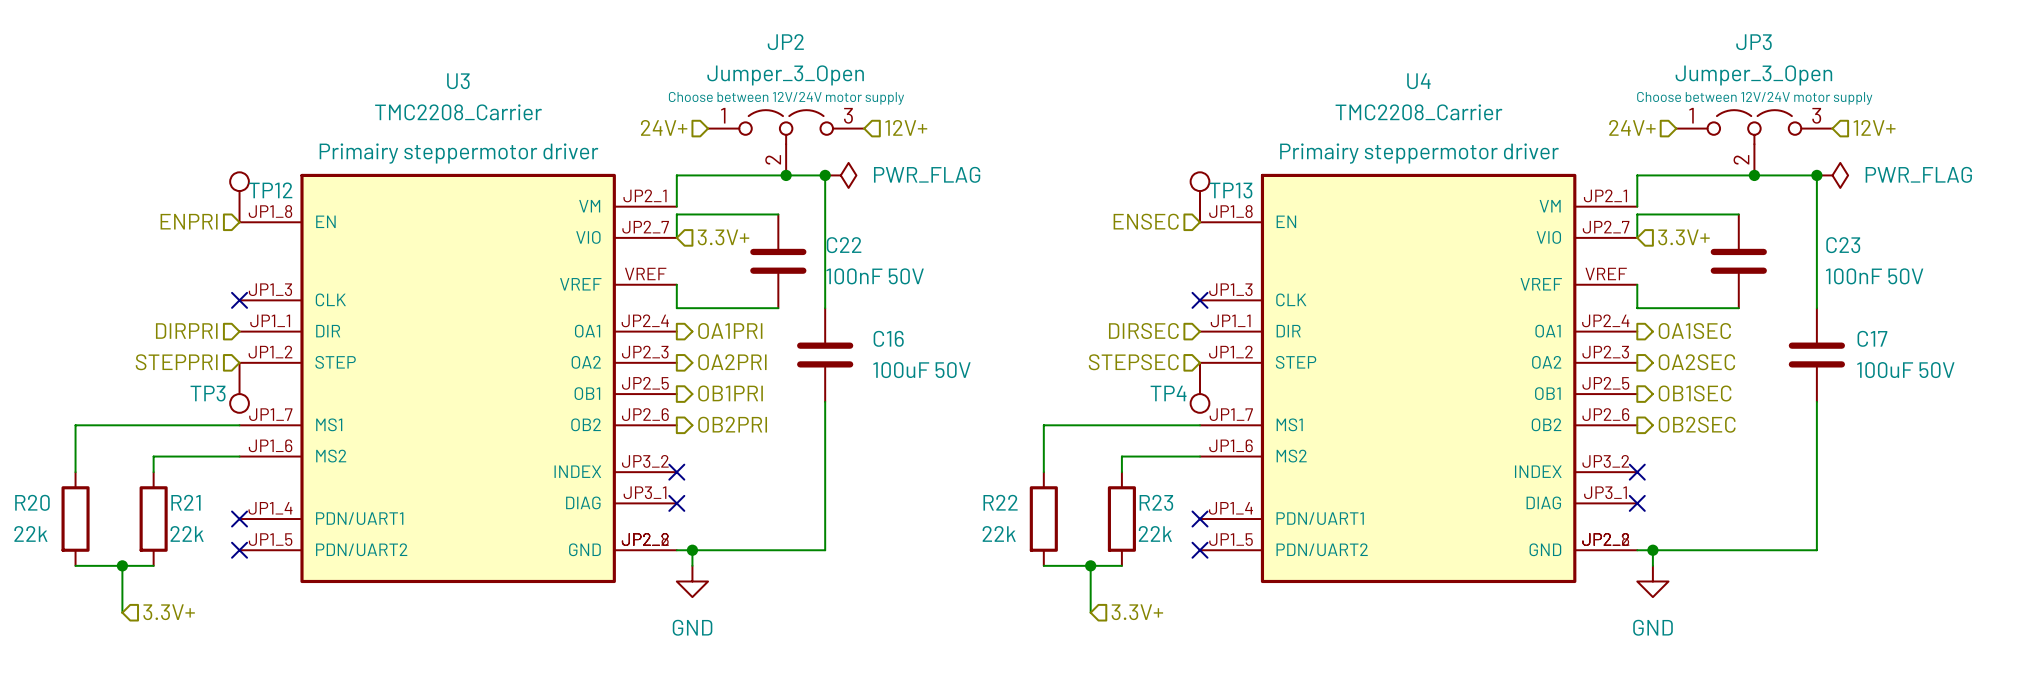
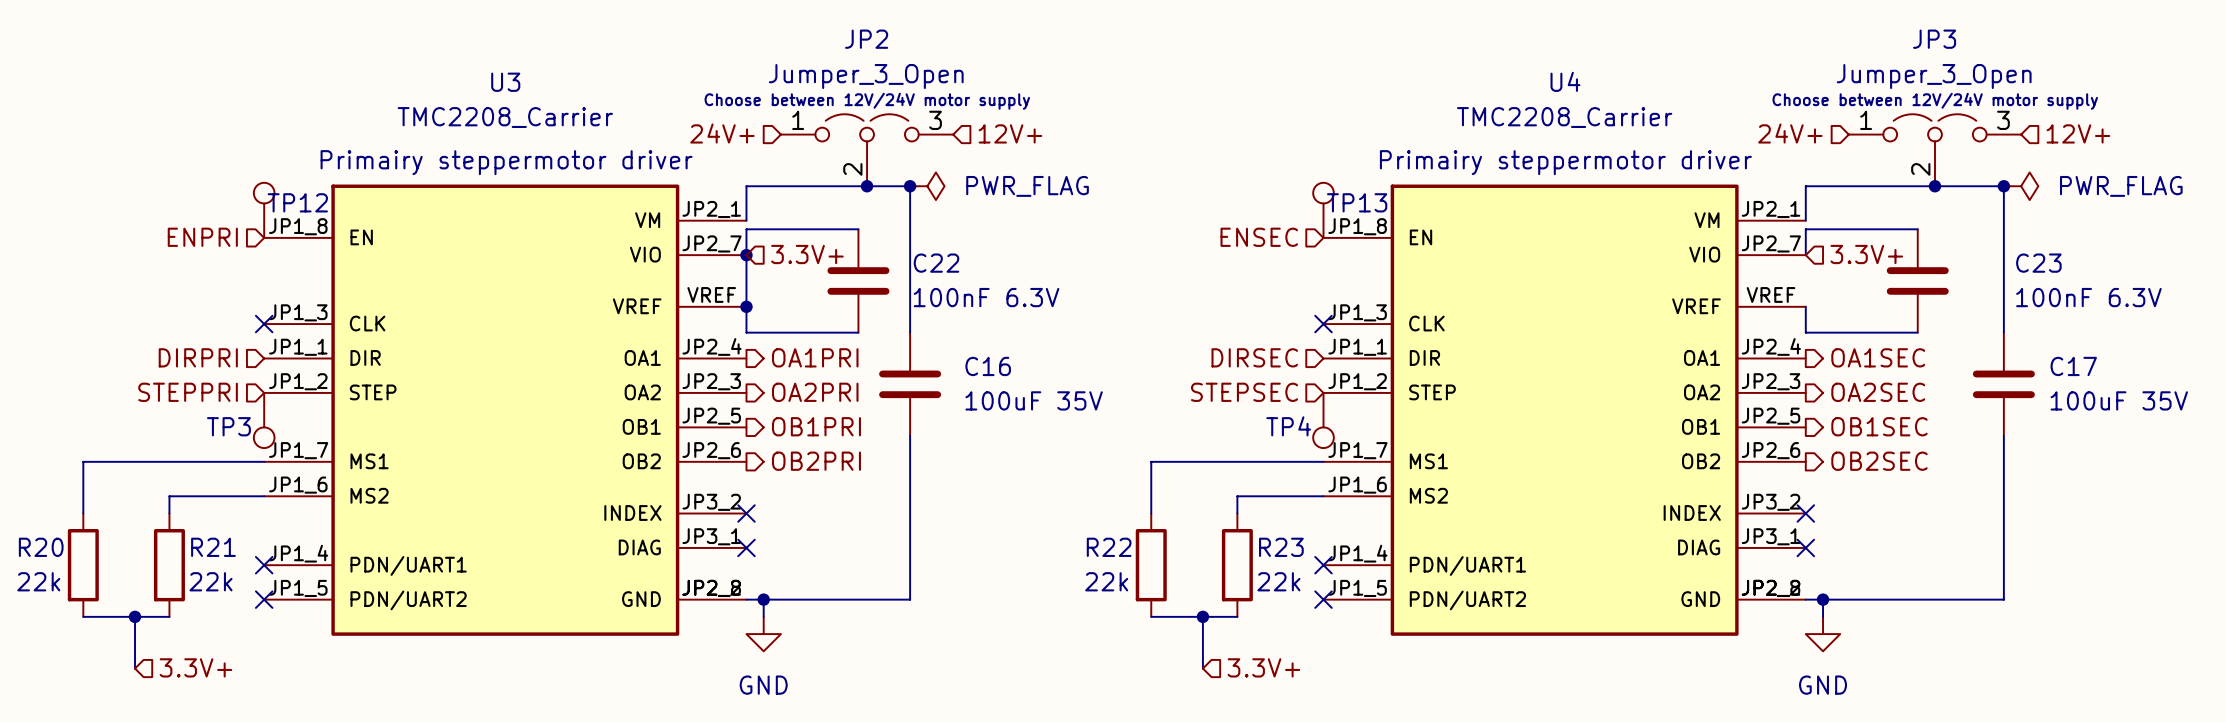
wire: none -> (746, 255) (746, 306)
junction: none -> (746, 255)
C22 value: 100nF 50V (875, 276) -> 100nF 6.3V (986, 297)
C23 value: 100nF 50V (1874, 276) -> 100nF 6.3V (2088, 297)
junction: none -> (746, 306)
C16 value: 100uF 50V (921, 370) -> 100uF 35V (1034, 400)
C17 value: 100uF 50V (1905, 370) -> 100uF 35V (2119, 400)

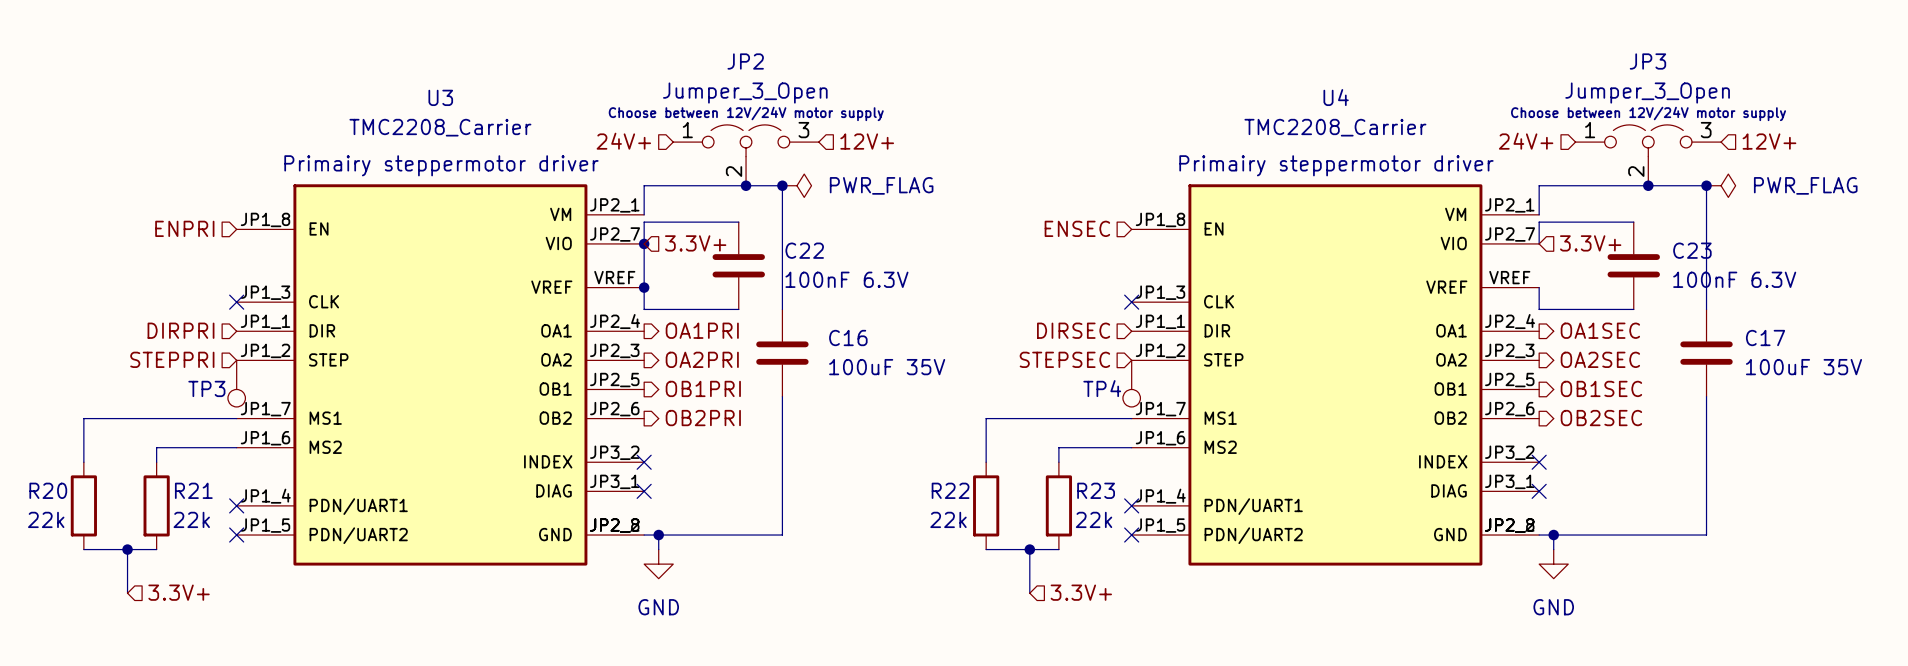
TP12: (264, 210) -> none
TP13: (1323, 210) -> none
C23 name position: C23 (2038, 263) -> C23 (1692, 250)
C23 value position: 100nF 6.3V (2088, 297) -> 100nF 6.3V (1734, 279)

